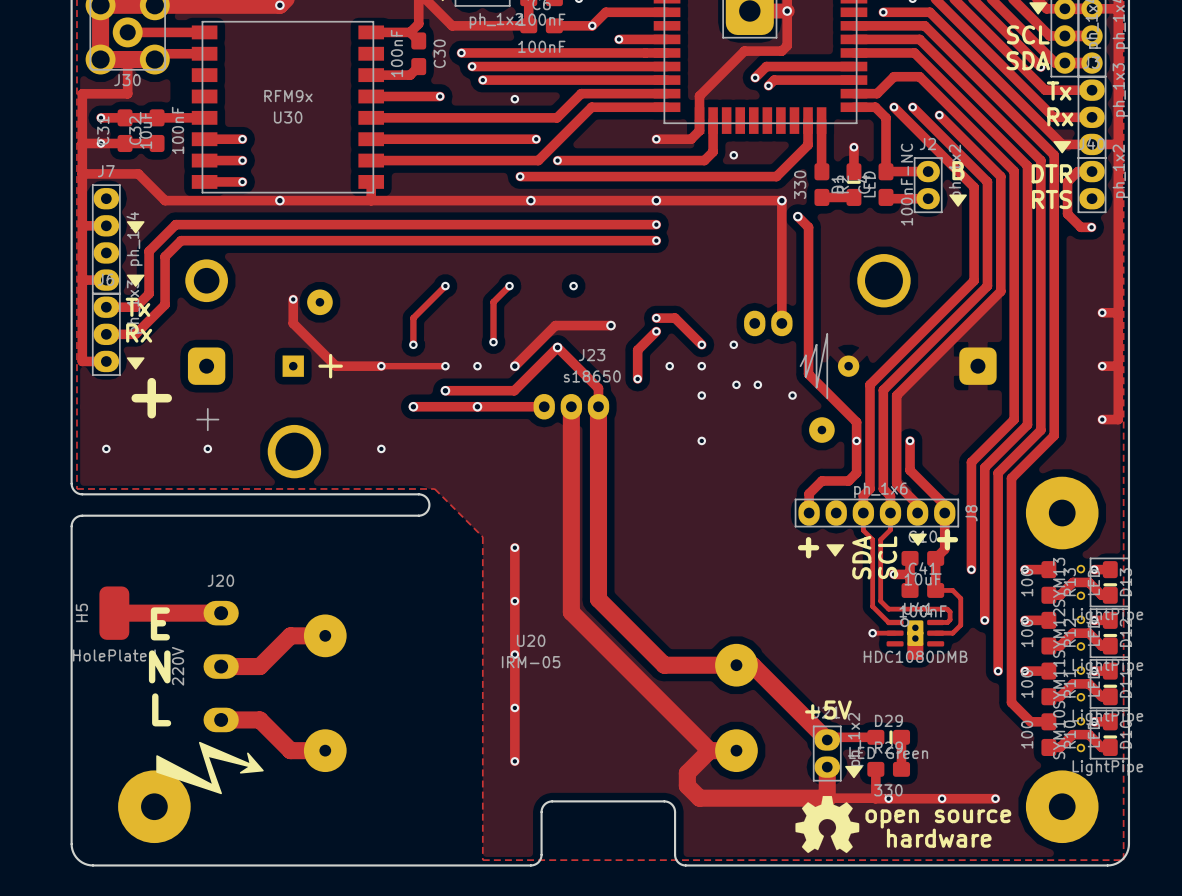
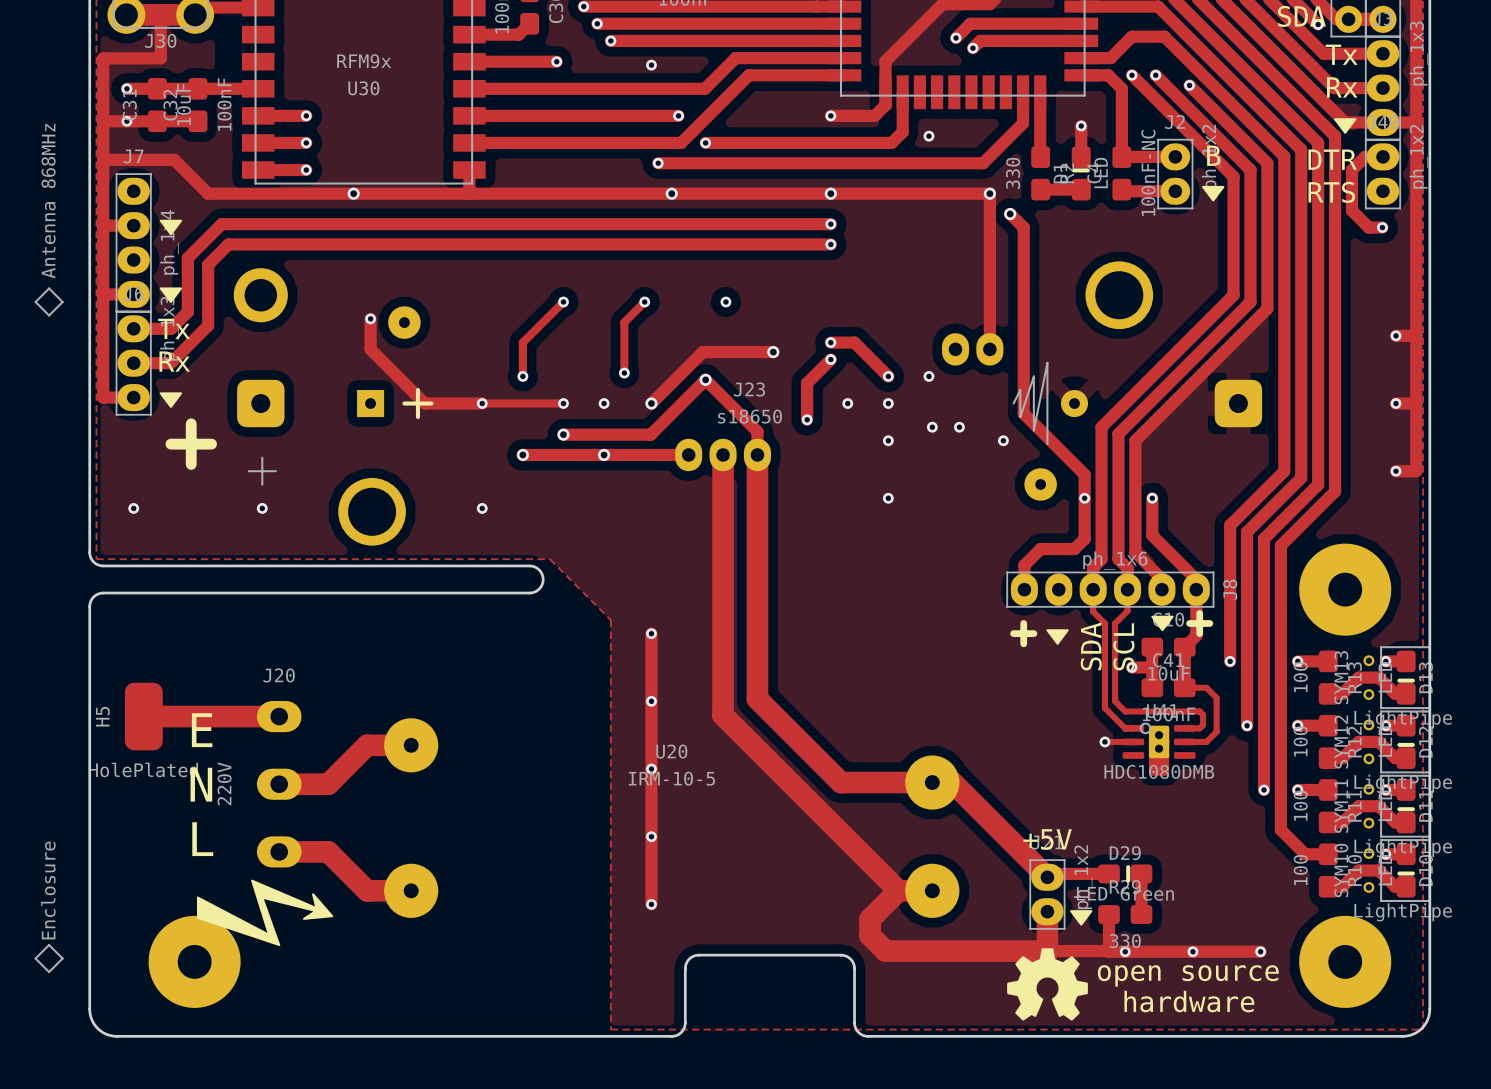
drawing: none -> [34, 287, 64, 317]
U20 value: IRM-05 (531, 662) -> IRM-10-5 (671, 778)
drawing: none -> [34, 943, 64, 974]

